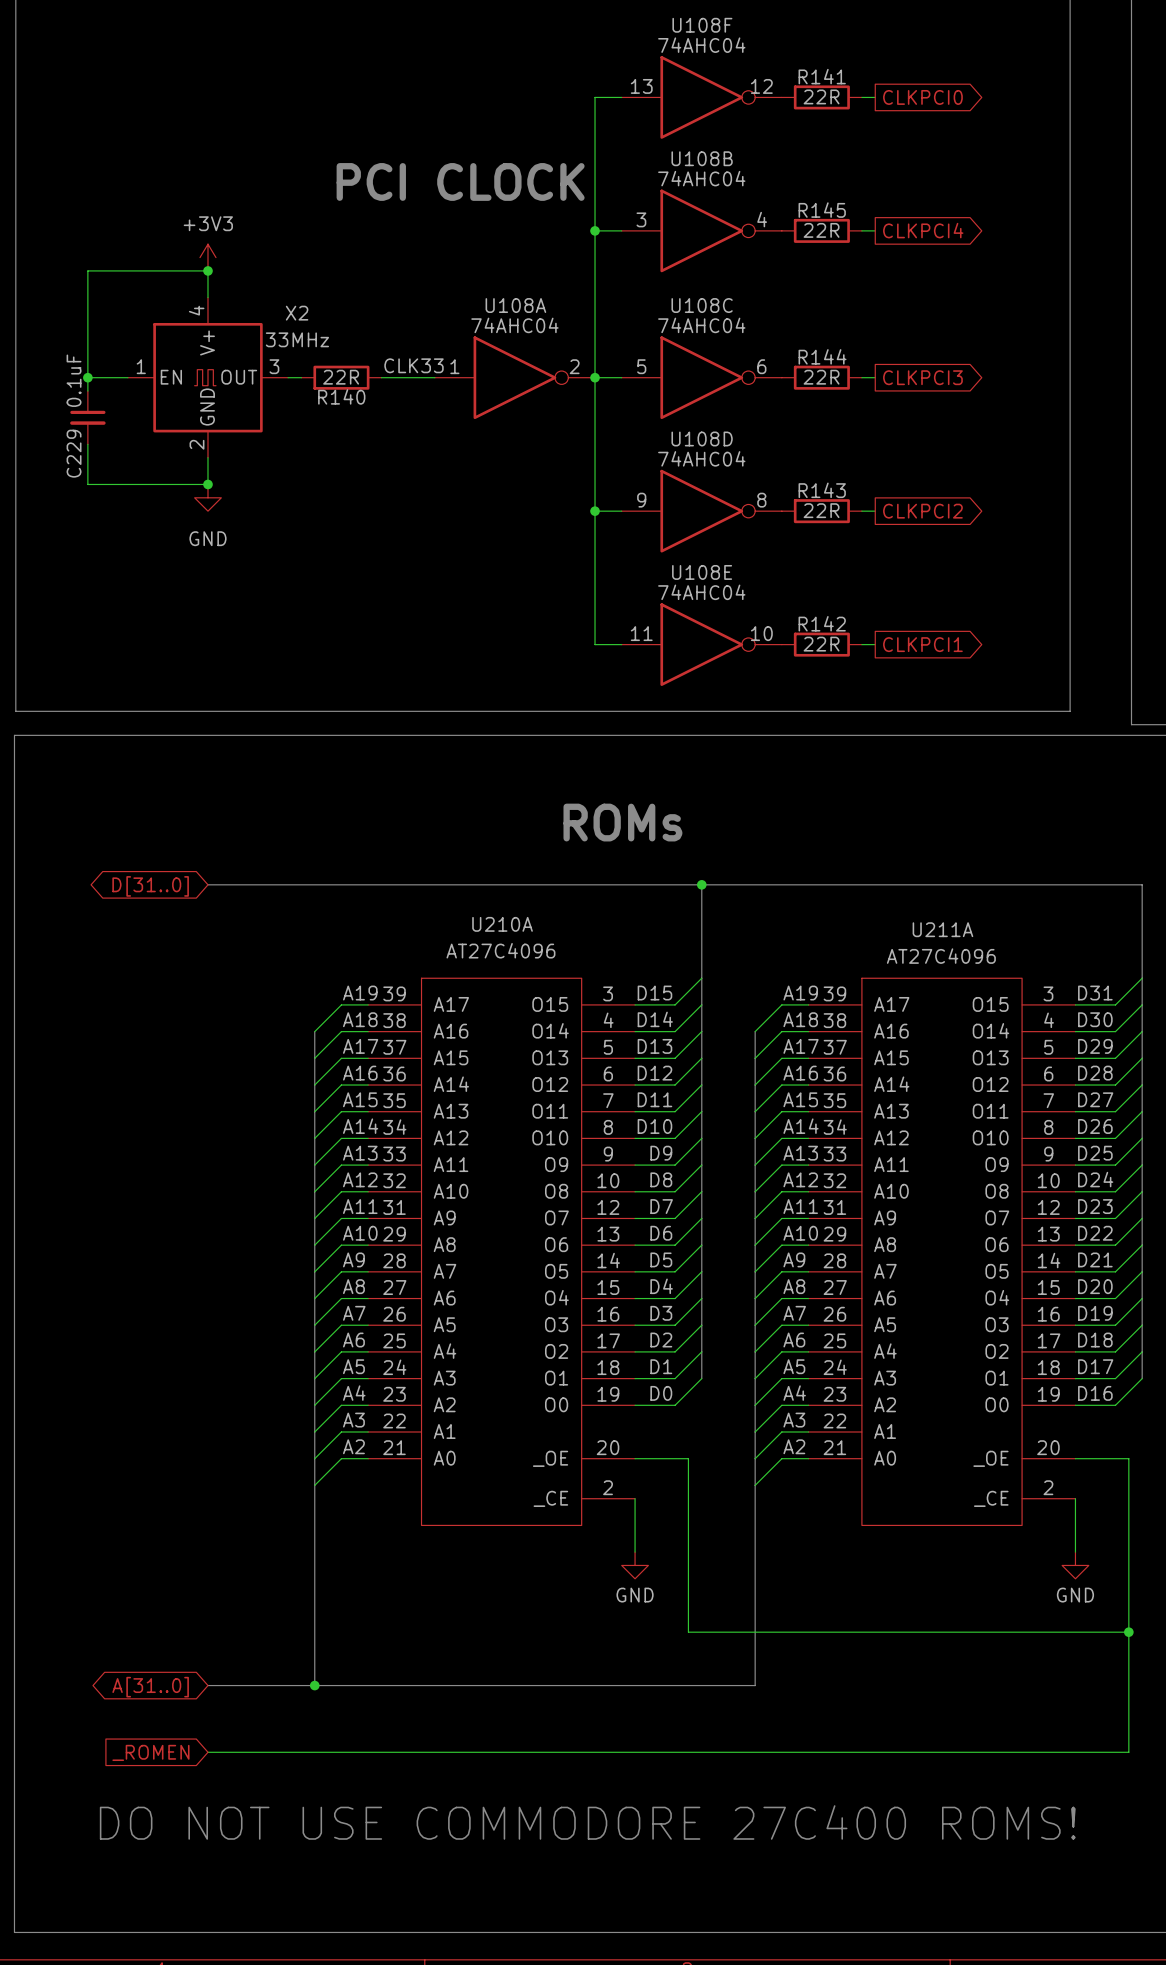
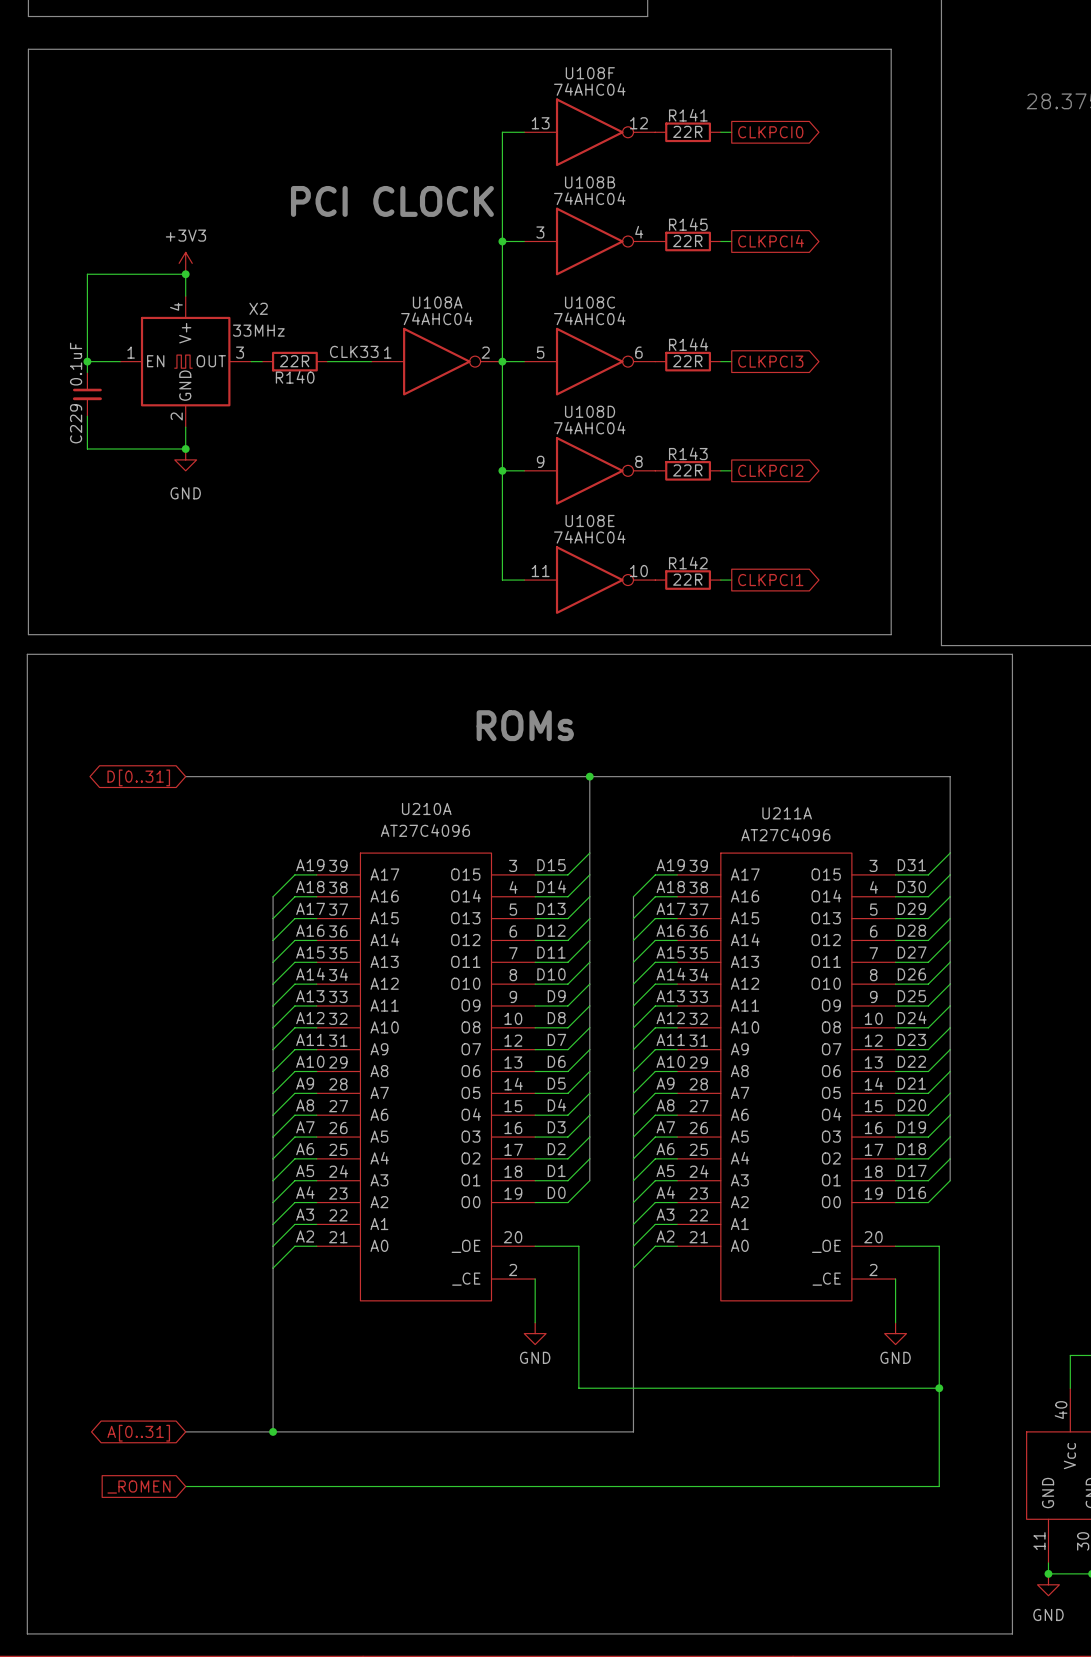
global label: D[31..0] (150, 886) -> D[0..31] (138, 777)
global label: A[31..0] (150, 1687) -> A[0..31] (138, 1433)
text: DO NOT USE COMMODORE 27C400 ROMS! (587, 1822) -> none

